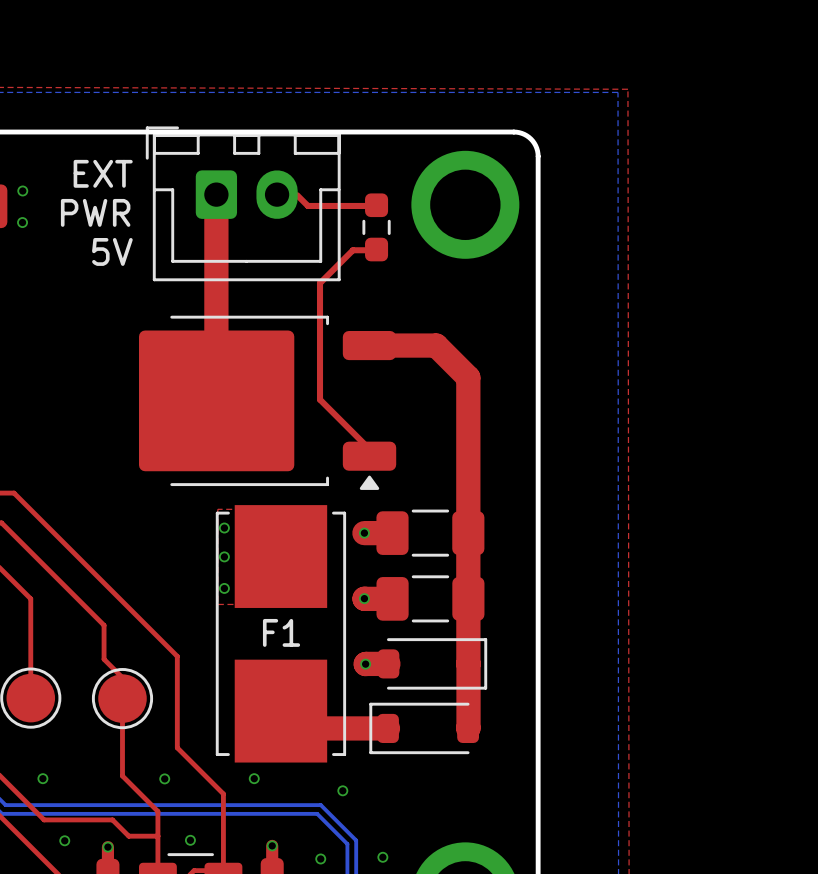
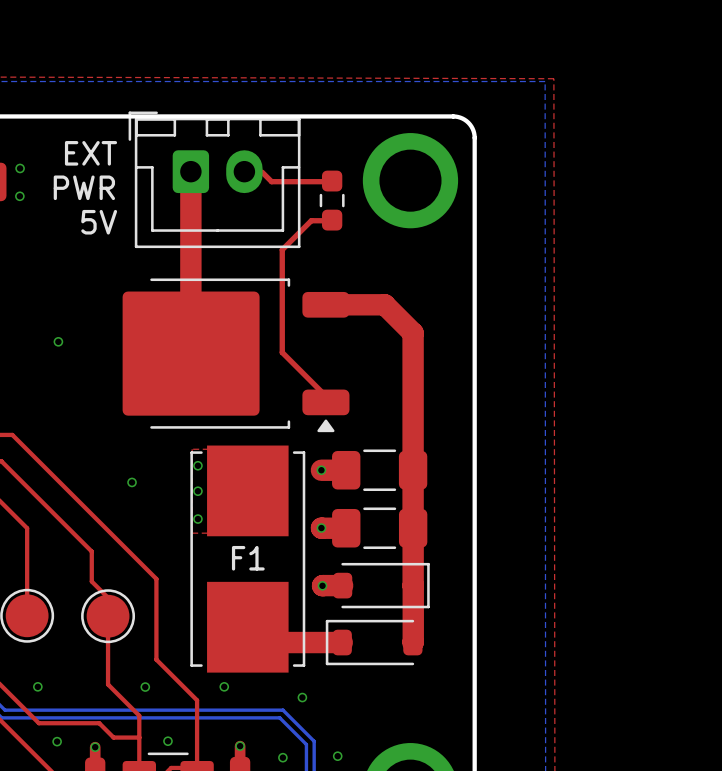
via: none -> (58, 341)
via: none -> (132, 482)

